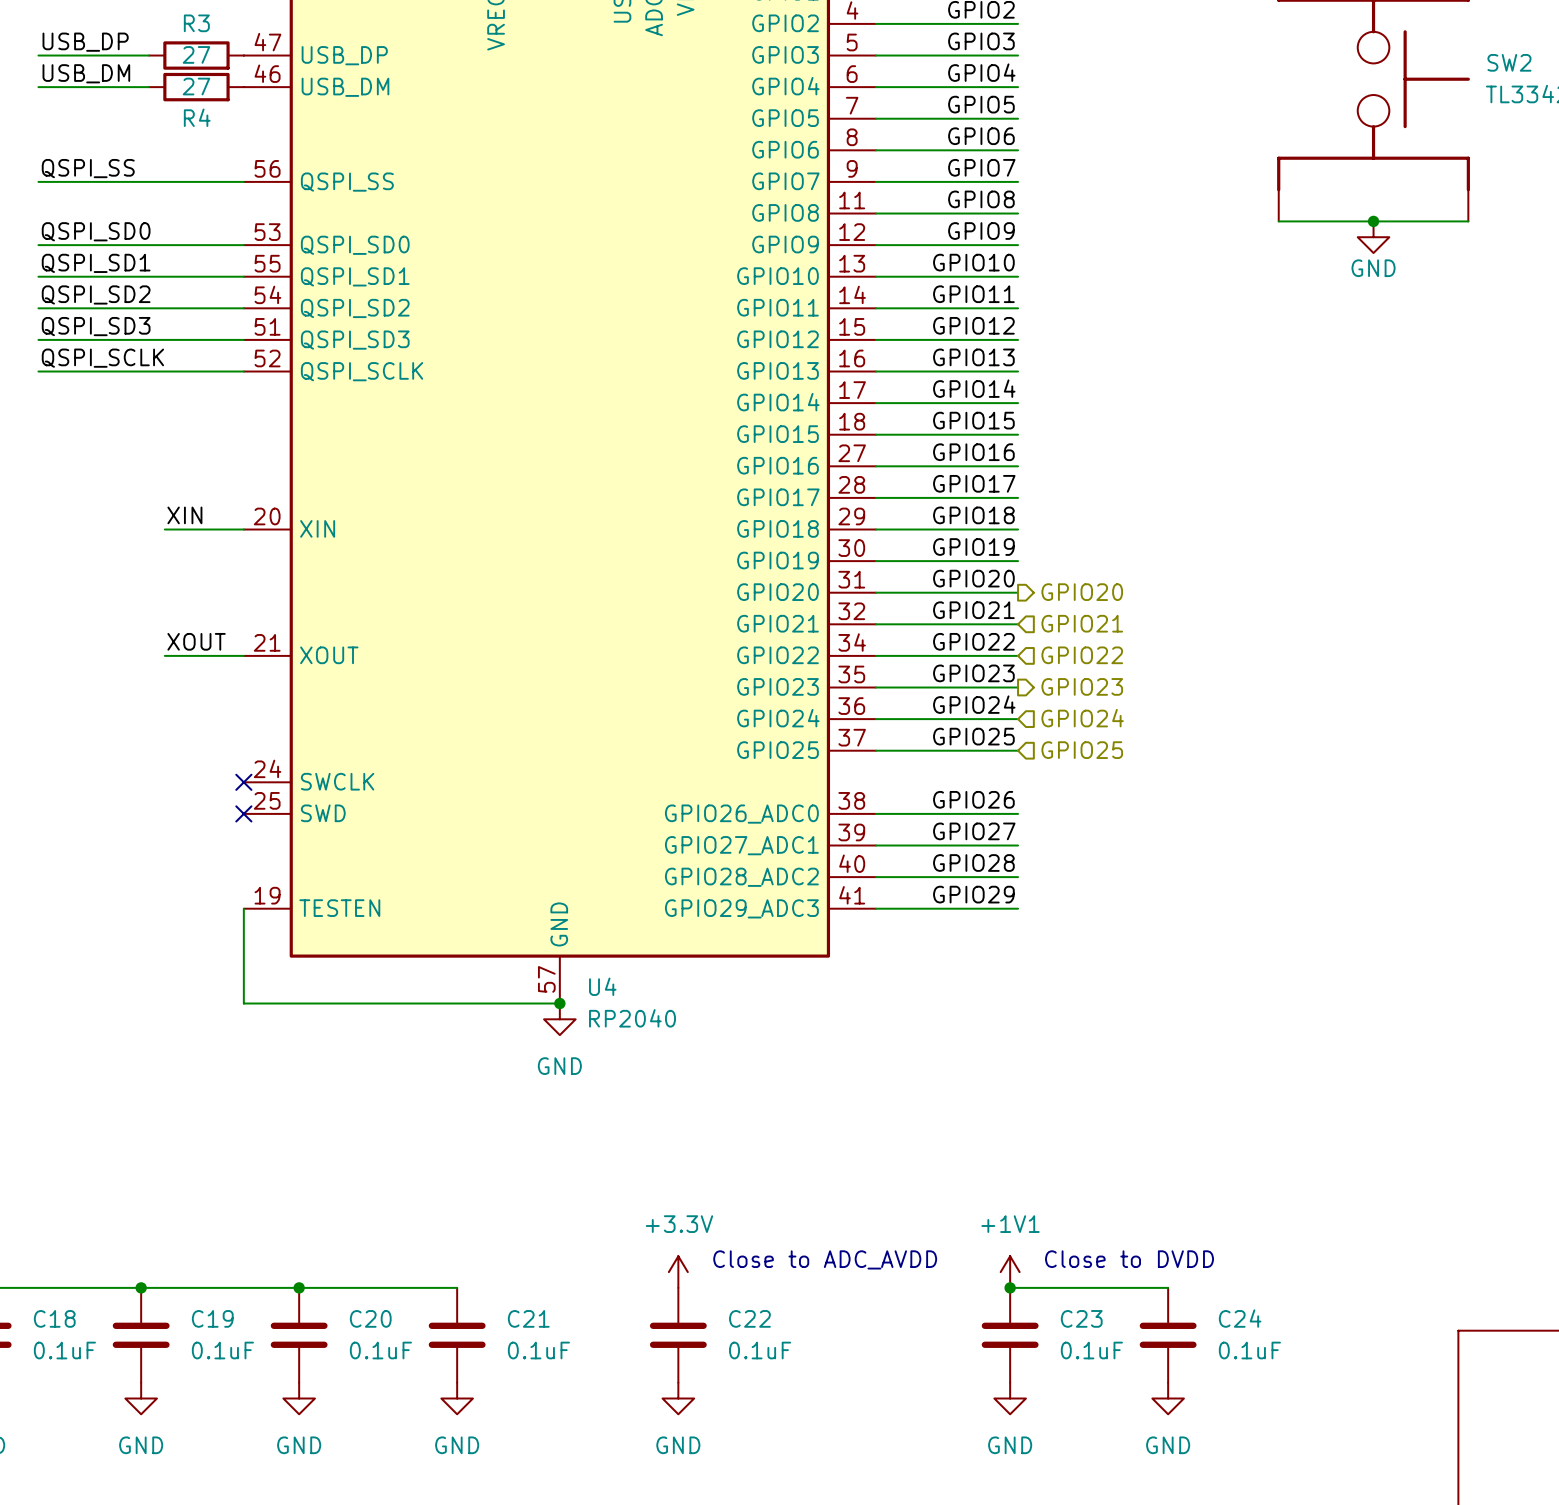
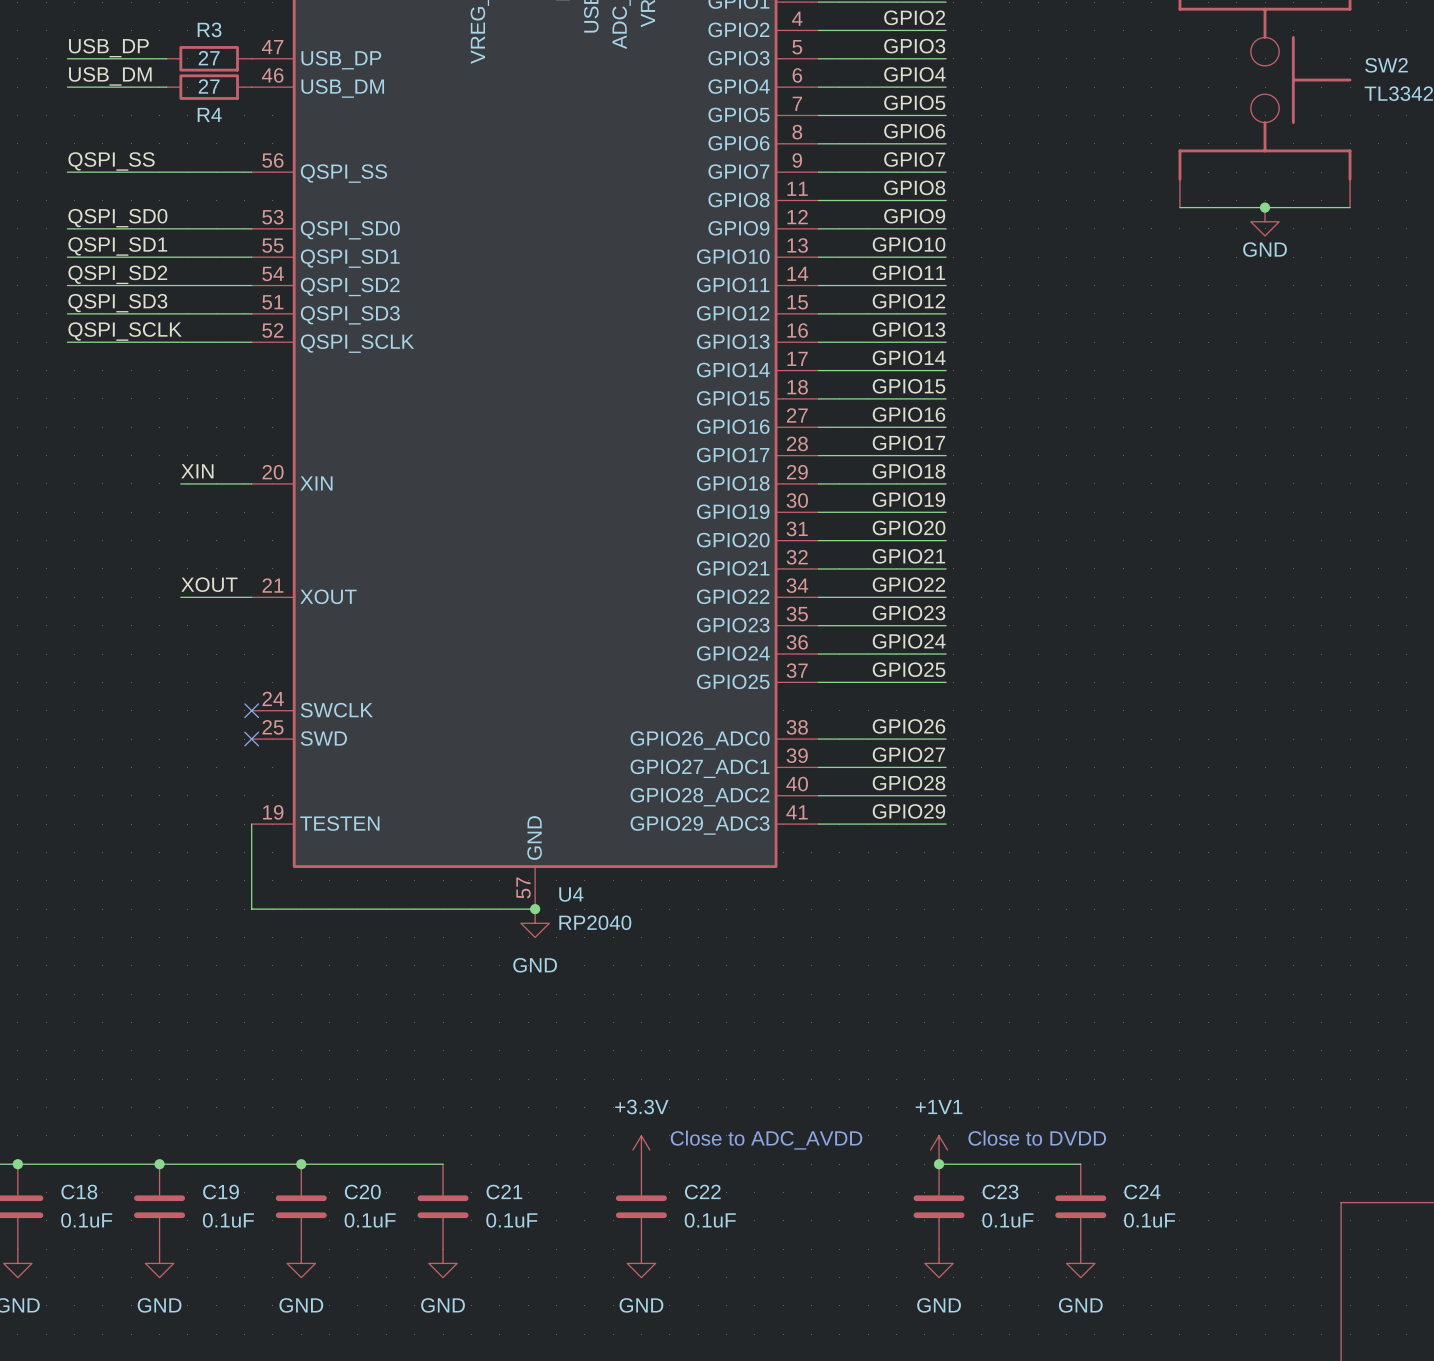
hierarchical label: GPIO20 (1082, 592) -> none
hierarchical label: GPIO21 (1082, 623) -> none
hierarchical label: GPIO22 (1082, 655) -> none
hierarchical label: GPIO23 (1082, 686) -> none
hierarchical label: GPIO24 (1082, 718) -> none
hierarchical label: GPIO25 (1082, 750) -> none

